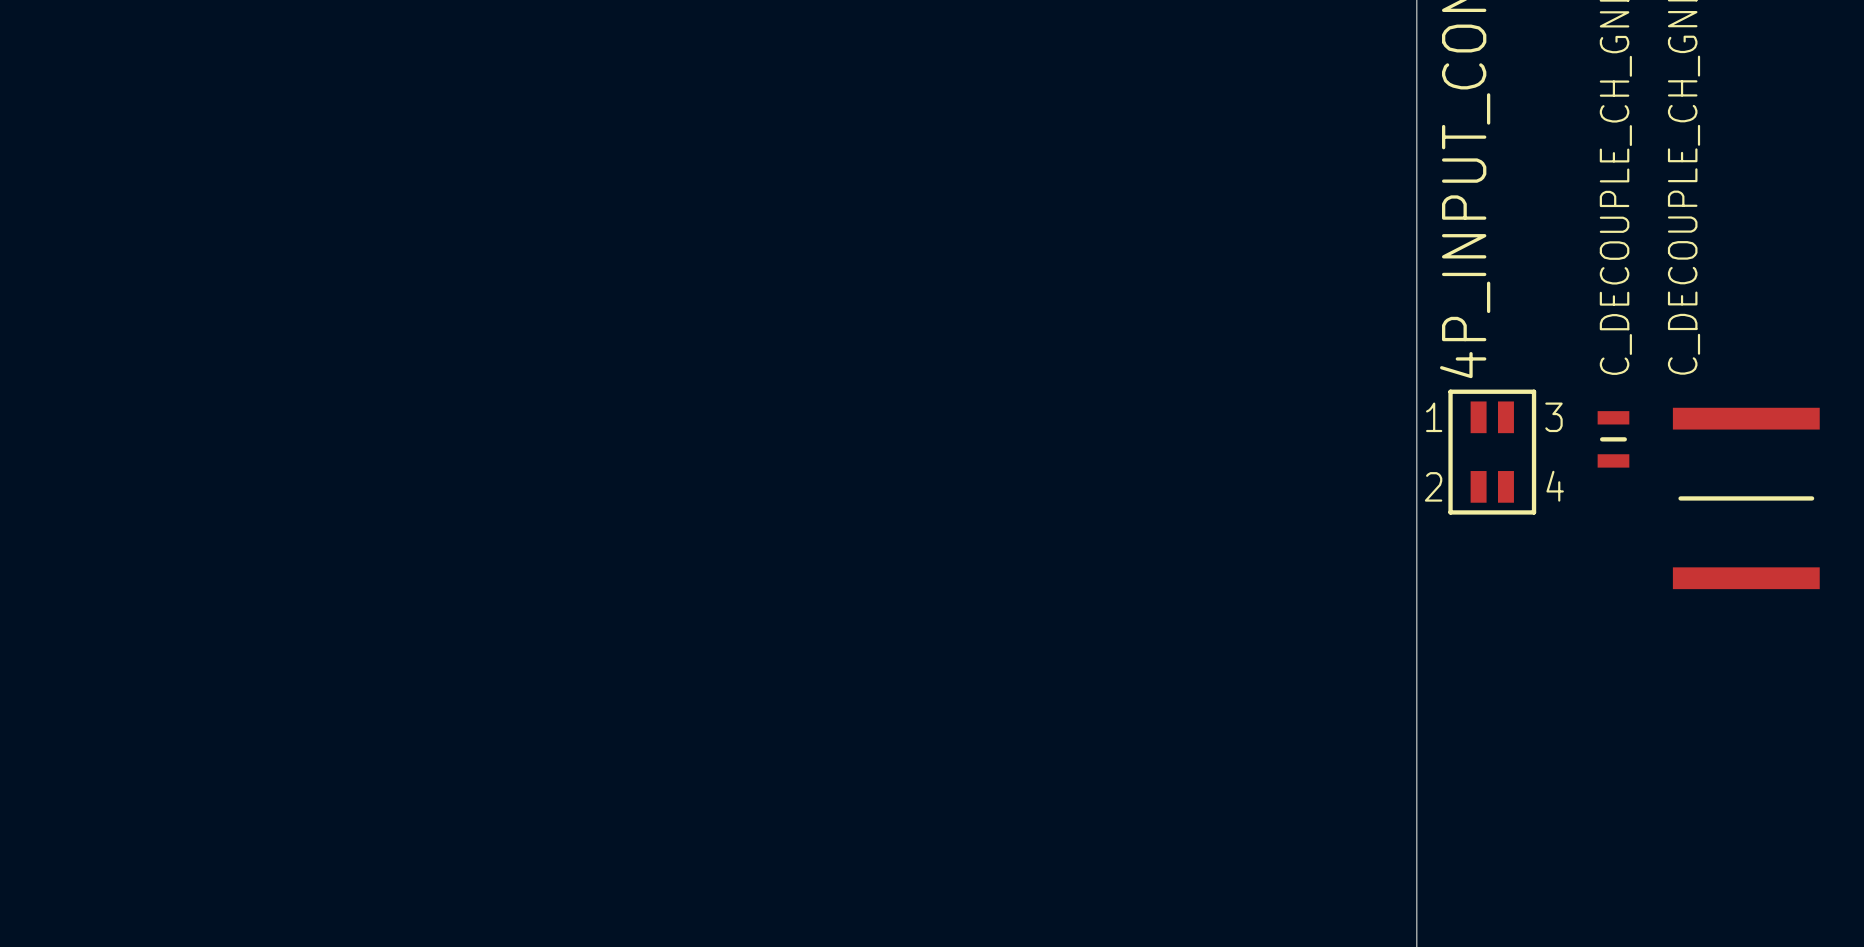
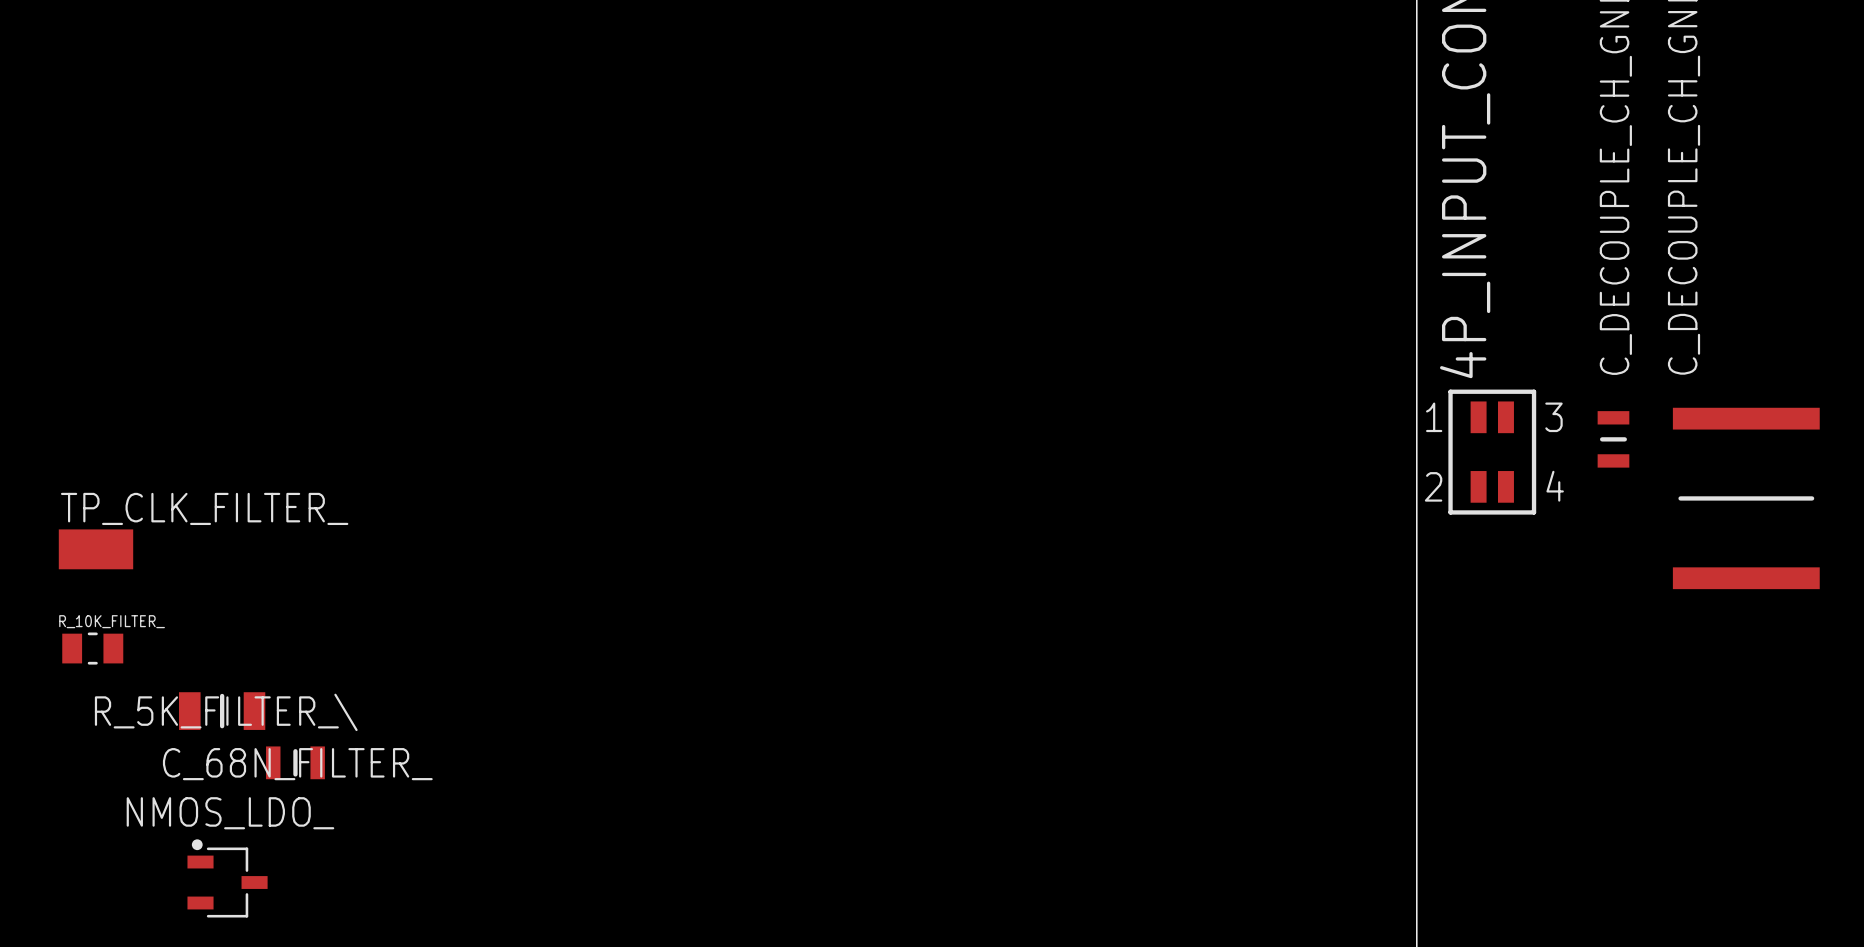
TP_CLK_FILTER_: none -> (95, 549)
R_10K_FILTER_: none -> (92, 648)
R_5K_FILTER_\: none -> (222, 711)
C_68N_FILTER_: none -> (295, 762)
NMOS_LDO_: none -> (227, 878)

